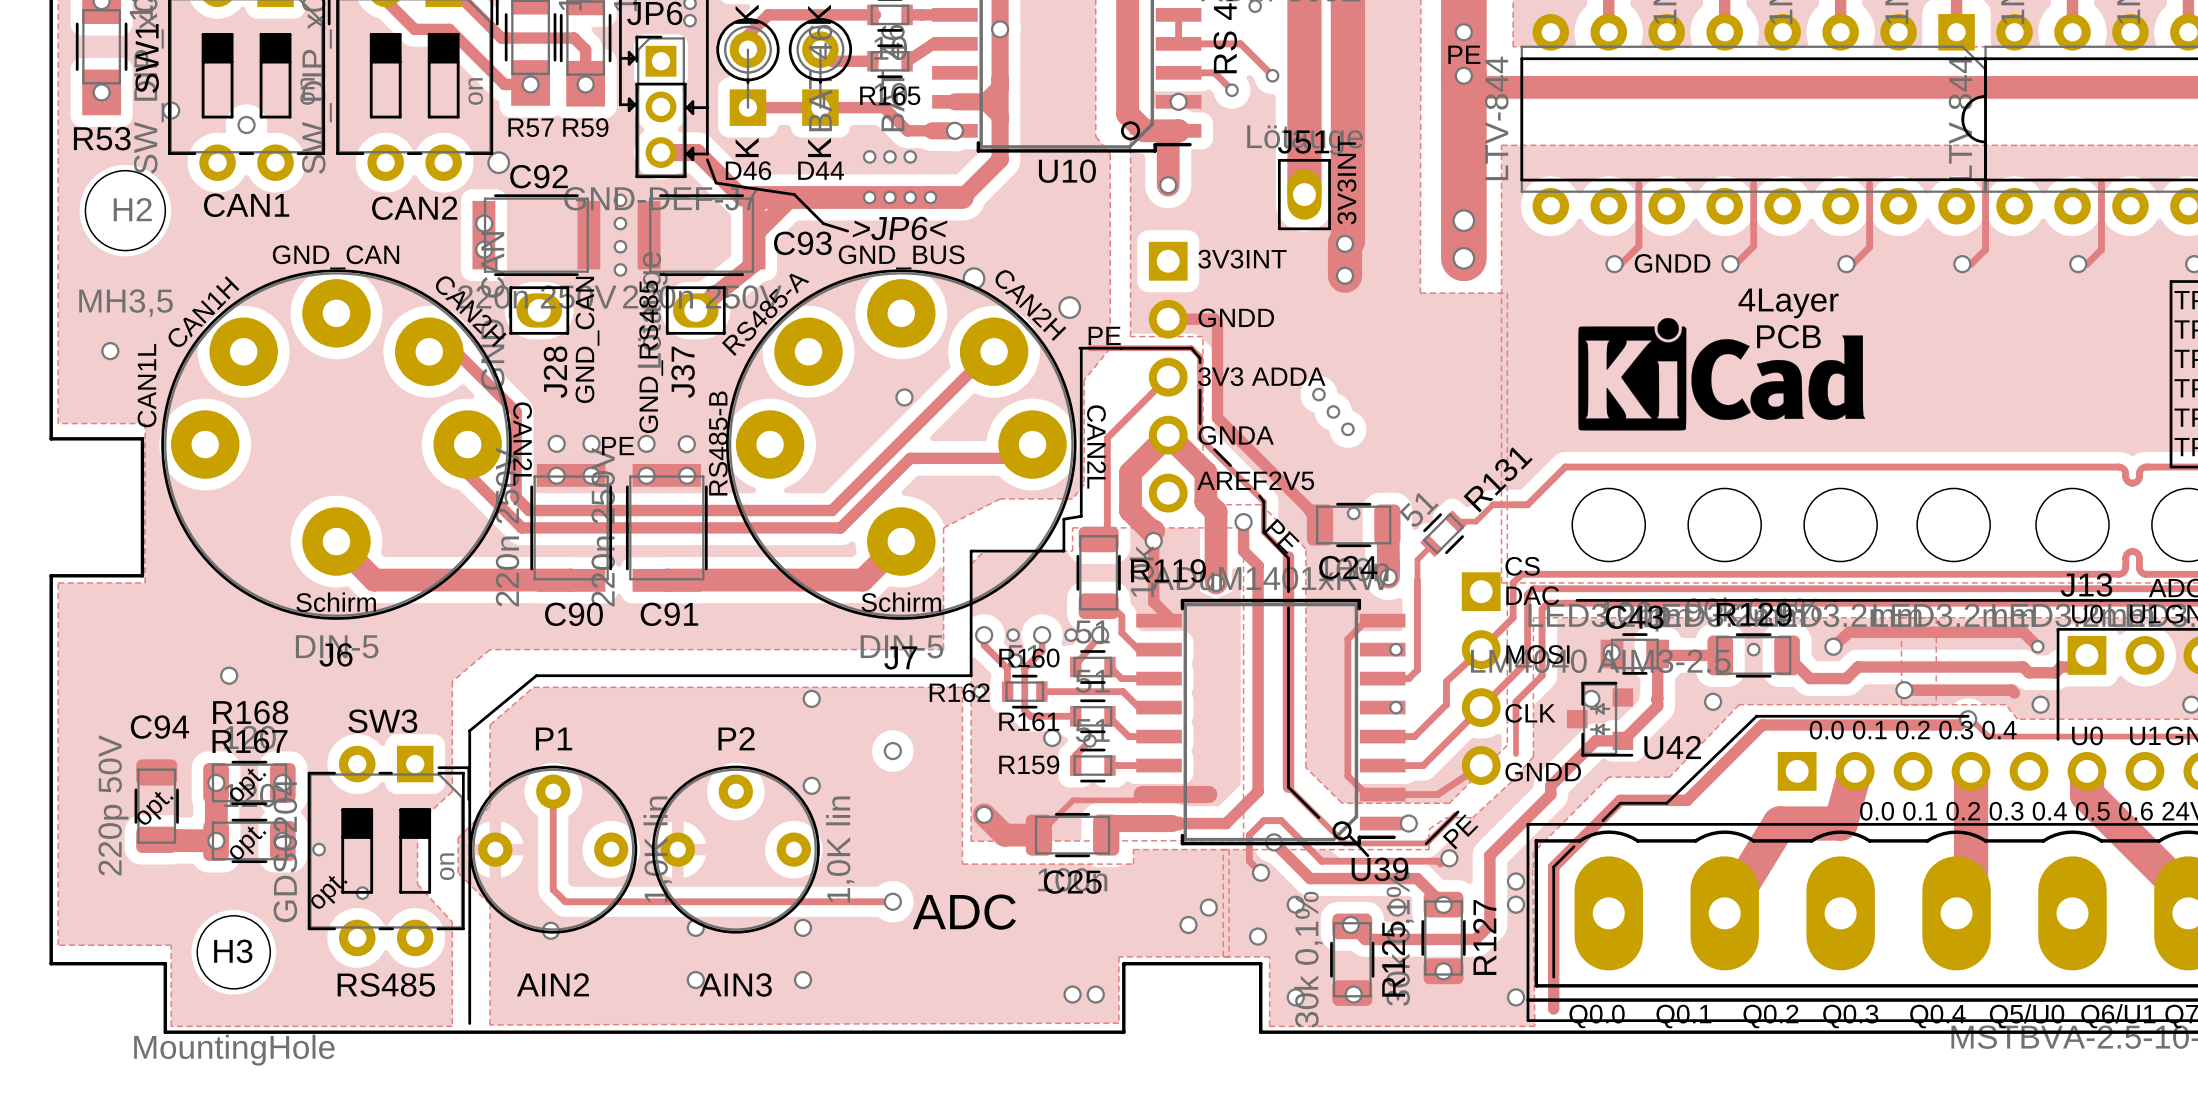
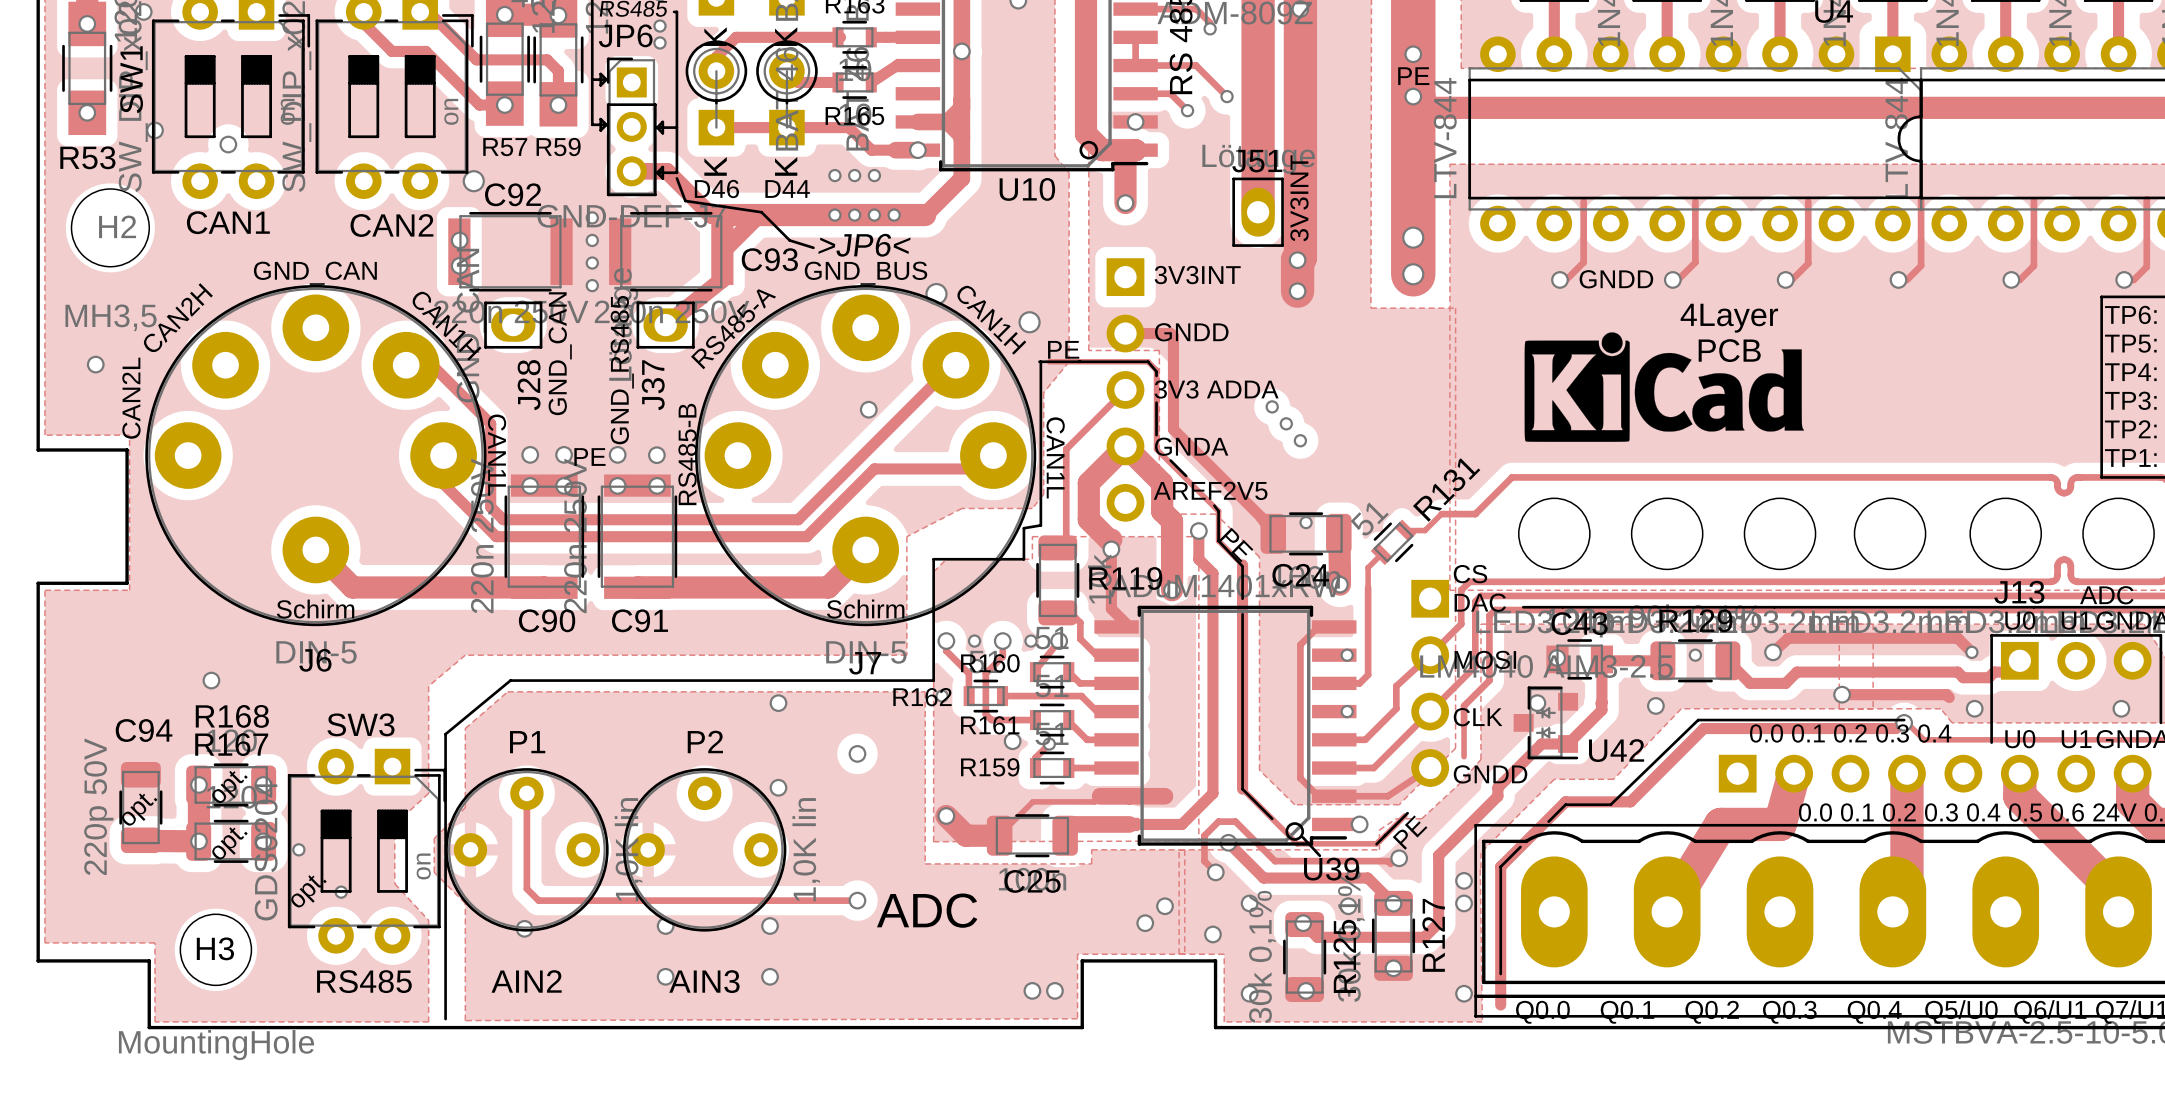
text: CAN2H (1030, 305) -> CAN1H (991, 320)
text: CAN1H (203, 311) -> CAN2H (178, 317)
text: CAN2H (471, 311) -> CAN1H (446, 326)
text: CAN1L (147, 385) -> CAN2L (131, 398)
text: CAN2L (522, 444) -> CAN1L (497, 455)
text: CAN2L (1096, 446) -> CAN1L (1055, 457)

